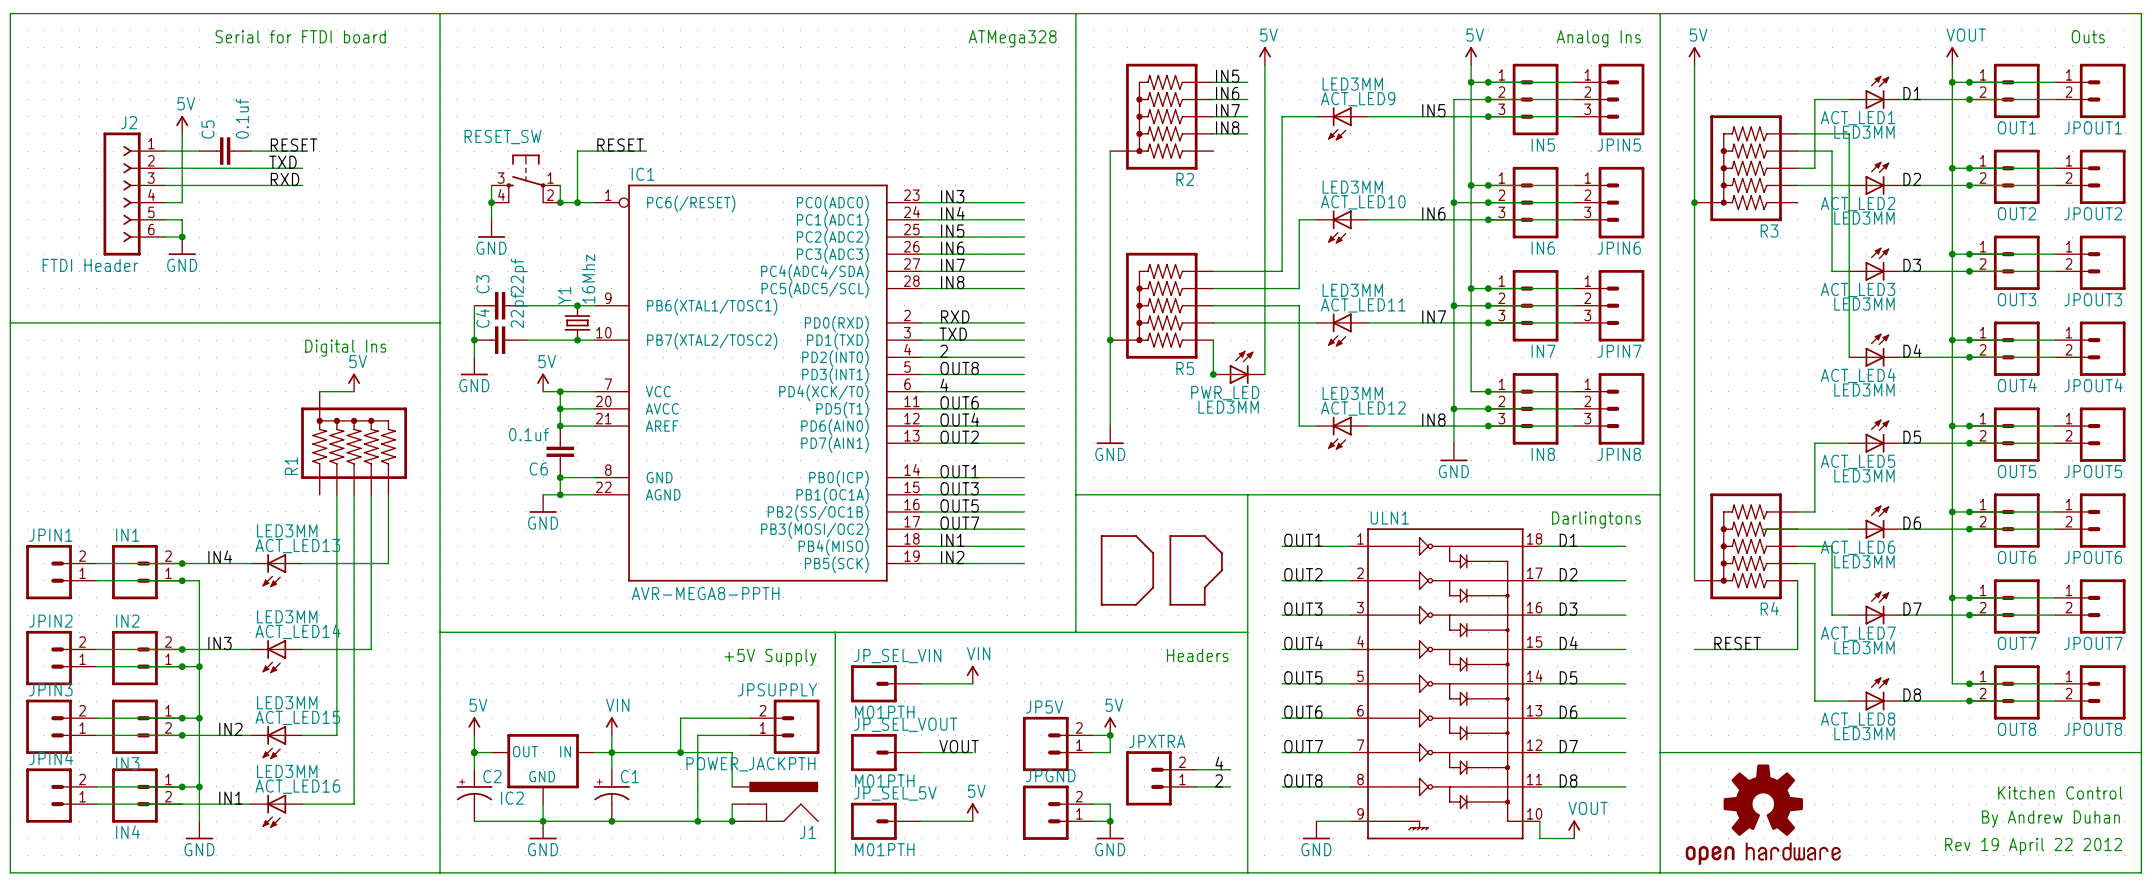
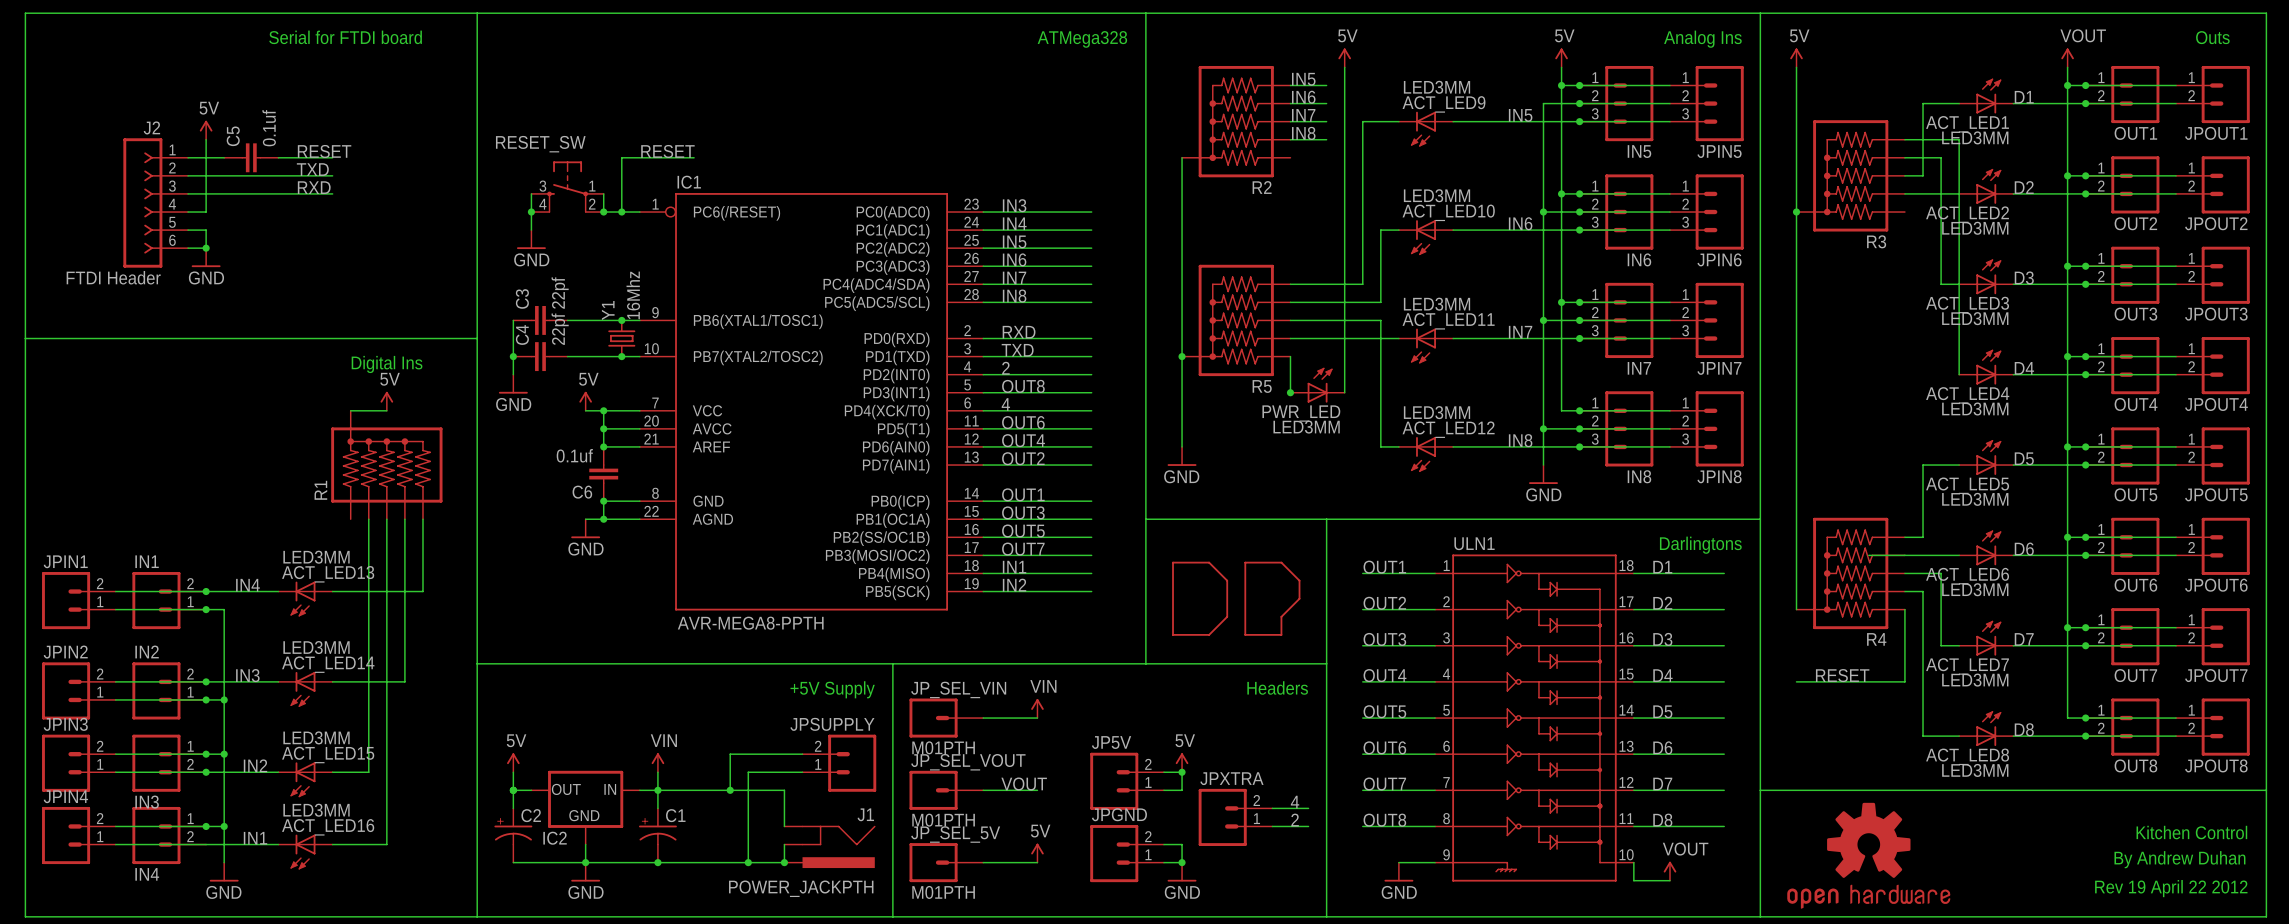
J1 flip: as is (783, 801) -> up-down (838, 846)

